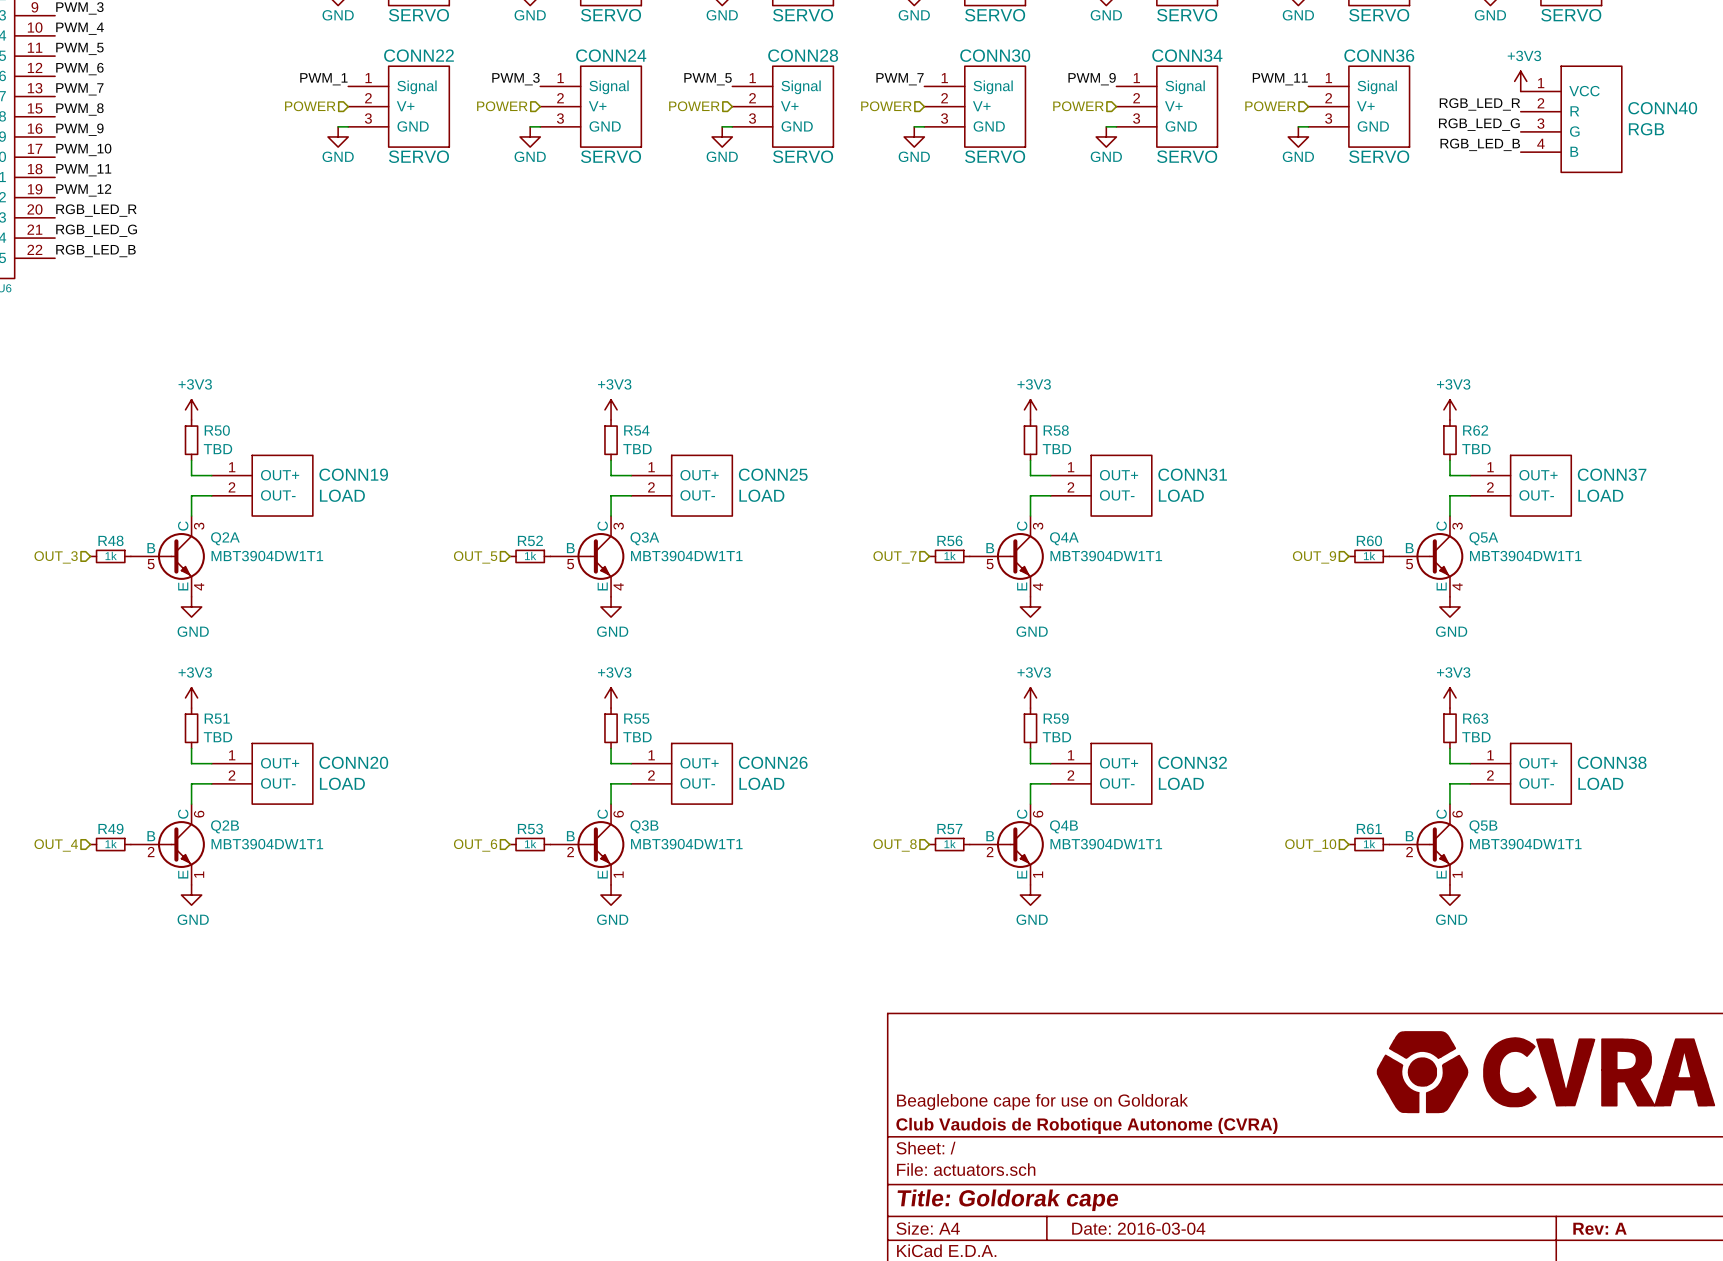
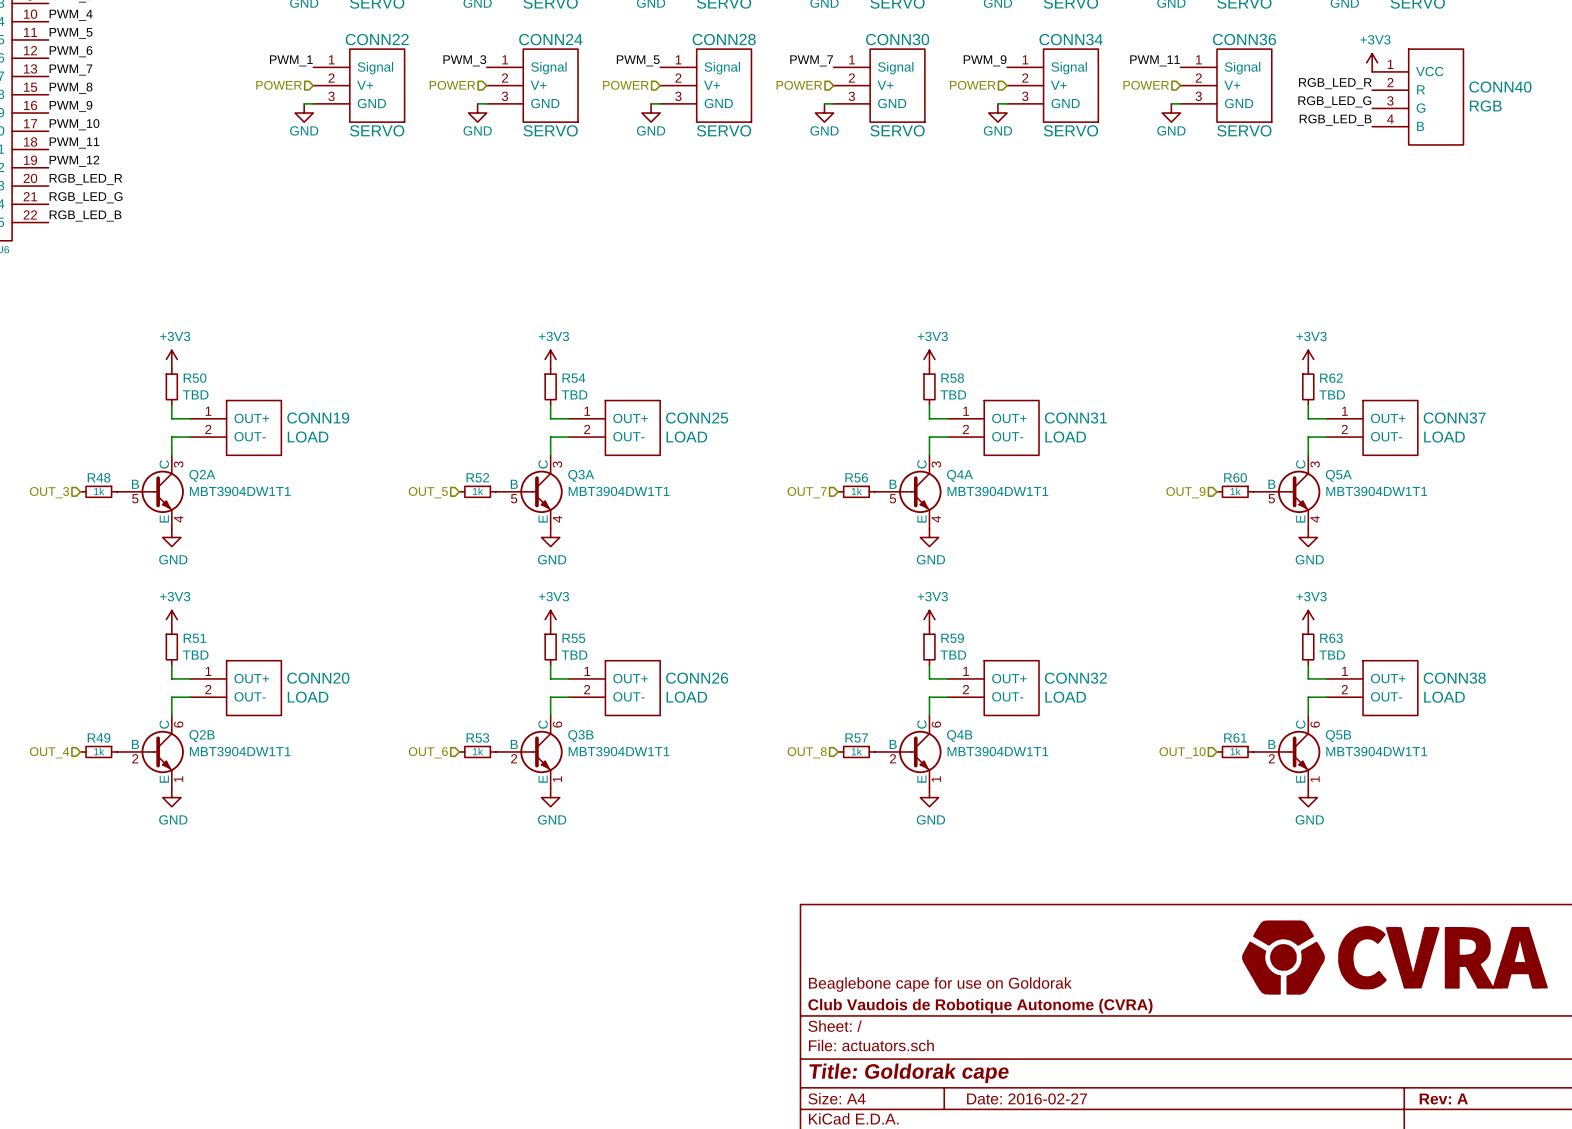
title block: Date: 2016-03-04 (1138, 1228) -> Date: 2016-02-27 (1027, 1098)

